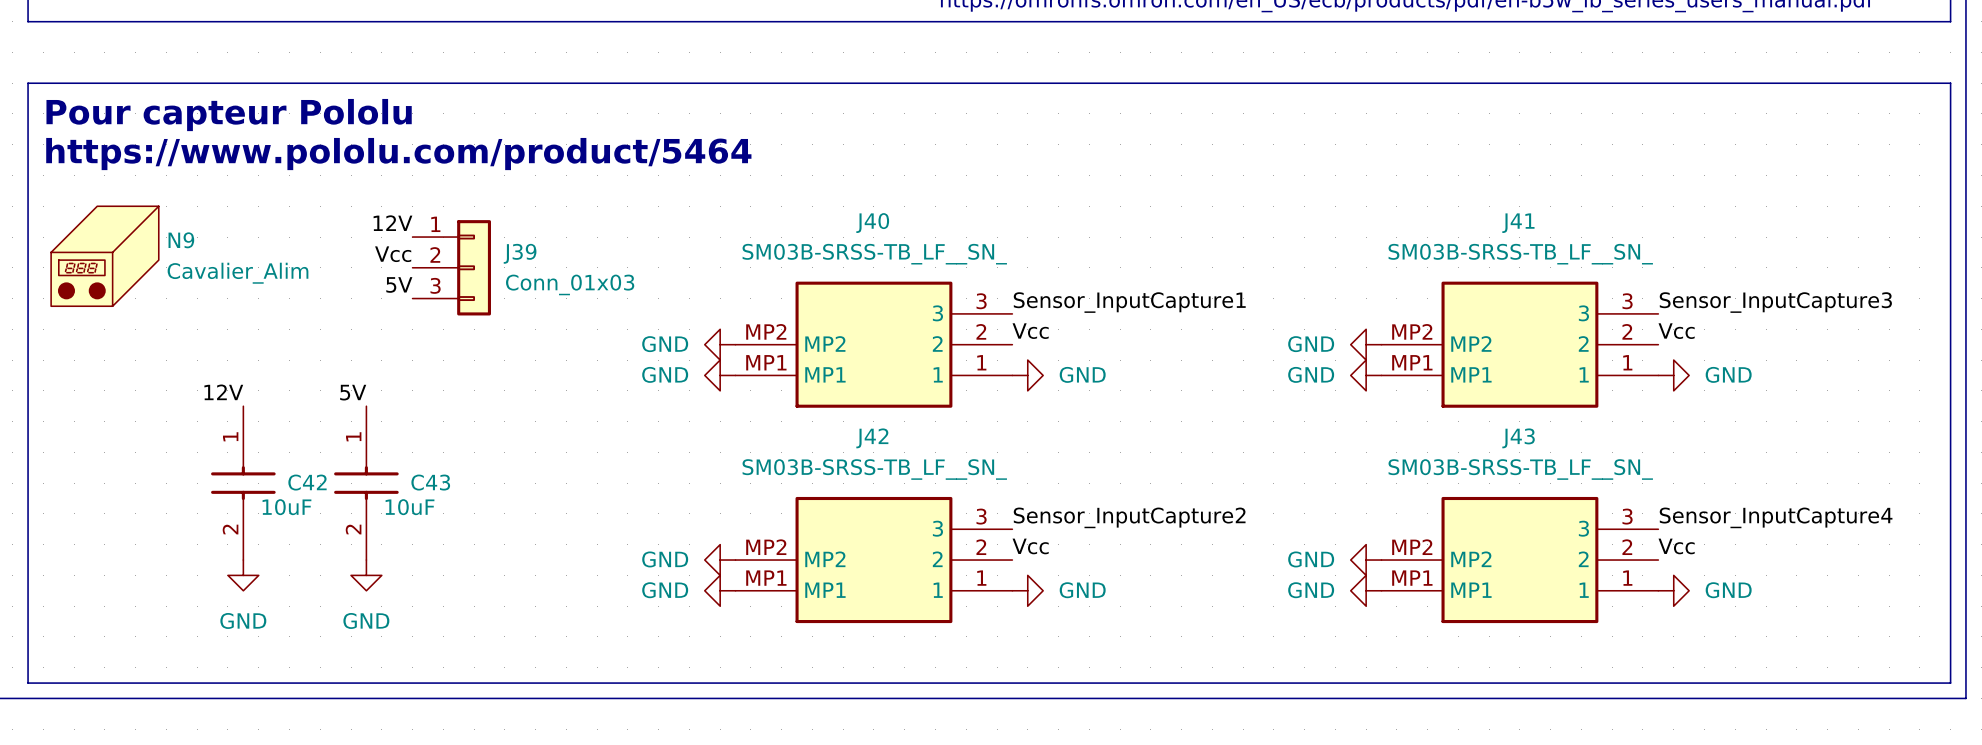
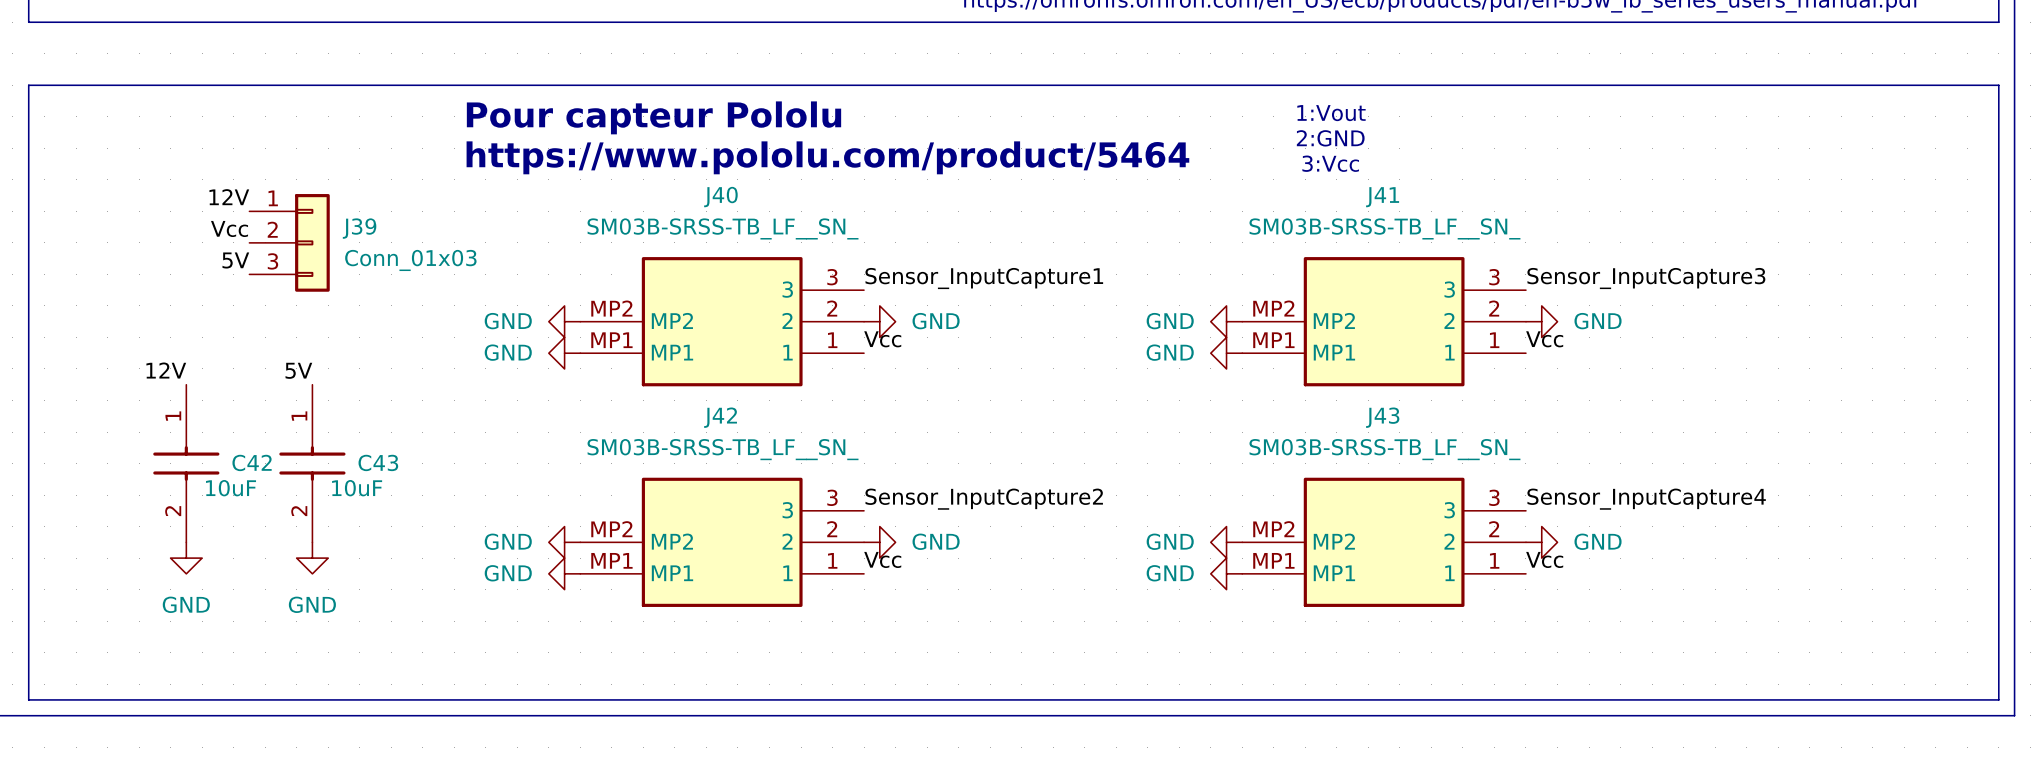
text: none -> 1:Vout (1331, 113)
text: Pour capteur Pololu (229, 115) -> none
text: none -> Pour capteur Pololu (654, 117)
text: none -> 2:GND (1330, 138)
text: https://www.pololu.com/product/5464 (398, 154) -> none
text: none -> https://www.pololu.com/product/5464 (827, 157)
text: none -> 3:Vcc (1330, 163)
label: none -> 12V (229, 197)
label: 12V (392, 223) -> none
label: none -> 5V (235, 260)
label position: Vcc (393, 254) -> Vcc (229, 228)
N9: Cavalier_Alim (104, 256) -> none
J39 position: (451, 267) -> (289, 242)
label: 5V (399, 284) -> none
label position: Sensor_InputCapture1 (1129, 302) -> Sensor_InputCapture1 (984, 278)
label position: Sensor_InputCapture3 (1775, 302) -> Sensor_InputCapture3 (1646, 278)
power symbol: none -> GND (564, 321)
power symbol: none -> GND (879, 321)
power symbol: none -> GND (1226, 321)
power symbol: none -> GND (1541, 321)
label: none -> Vcc (882, 339)
label: Vcc (1030, 331) -> none
label: none -> Vcc (1544, 339)
label: Vcc (1676, 331) -> none
power symbol: none -> GND (564, 353)
power symbol: GND (720, 344) -> none
J40 position: (873, 344) -> (722, 321)
power symbol: none -> GND (1226, 353)
power symbol: GND (1366, 344) -> none
J41 position: (1519, 344) -> (1384, 321)
label: none -> 5V (298, 370)
power symbol: GND (720, 375) -> none
power symbol: GND (1027, 375) -> none
power symbol: GND (1366, 375) -> none
power symbol: GND (1673, 375) -> none
label position: 12V (223, 392) -> 12V (166, 370)
label: 5V (353, 392) -> none
C42 position: (243, 483) -> (186, 463)
C43 position: (366, 483) -> (312, 463)
label position: Sensor_InputCapture2 (1129, 517) -> Sensor_InputCapture2 (984, 499)
label position: Sensor_InputCapture4 (1776, 517) -> Sensor_InputCapture4 (1646, 499)
power symbol: none -> GND (564, 542)
power symbol: none -> GND (879, 542)
power symbol: none -> GND (1226, 542)
power symbol: none -> GND (1541, 542)
power symbol: none -> GND (186, 558)
power symbol: none -> GND (312, 558)
label: none -> Vcc (882, 559)
label: Vcc (1030, 546) -> none
label: none -> Vcc (1544, 559)
label: Vcc (1676, 546) -> none
power symbol: none -> GND (564, 573)
power symbol: GND (720, 560) -> none
J42 position: (873, 560) -> (722, 542)
power symbol: none -> GND (1226, 573)
power symbol: GND (1366, 560) -> none
J43 position: (1519, 560) -> (1384, 542)
power symbol: GND (243, 575) -> none
power symbol: GND (366, 575) -> none
power symbol: GND (720, 590) -> none
power symbol: GND (1027, 590) -> none
power symbol: GND (1366, 590) -> none
power symbol: GND (1673, 590) -> none

